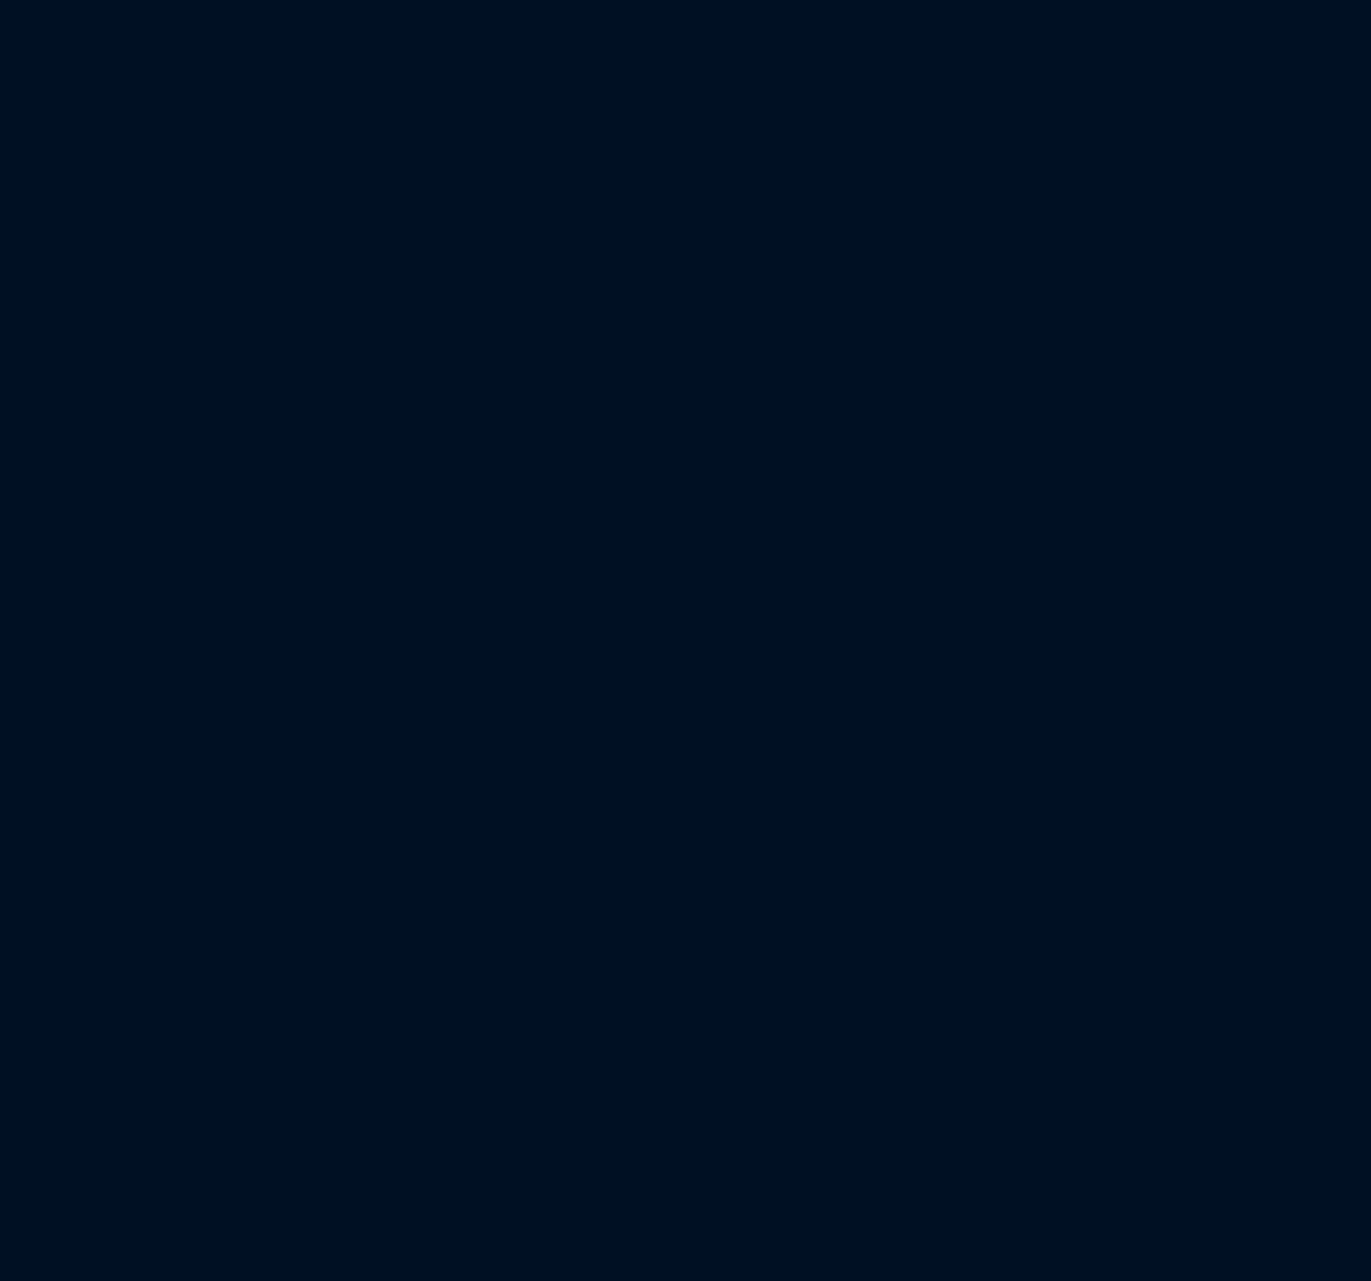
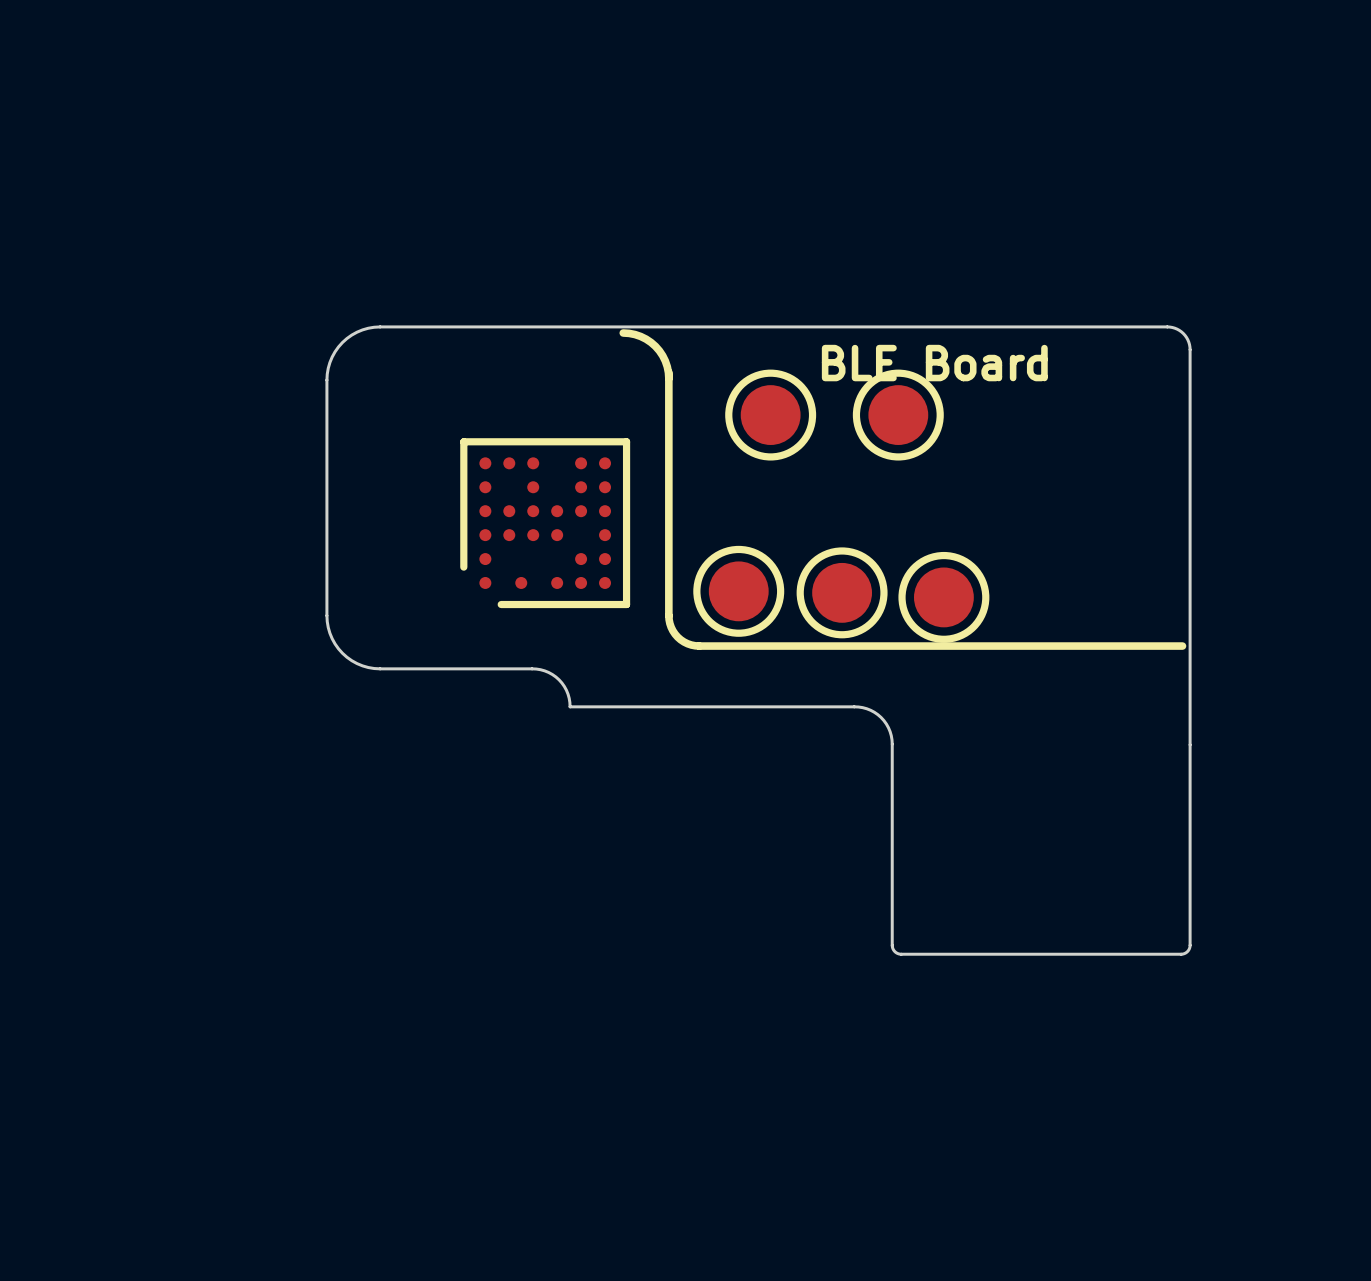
board edge: none -> (380, 326) (1167, 326) (1181, 331) (1187, 339) (1190, 349) (1190, 945) (1188, 950) (1181, 954) (901, 954) (895, 952) (892, 945) (892, 739) (883, 720) (866, 708) (854, 706) (570, 706) (568, 694) (561, 683) (552, 674) (540, 669) (374, 668) (357, 663) (346, 657) (332, 638) (327, 621) (327, 374) (332, 357) (342, 342) (357, 332) (380, 326)
line: none -> (623, 333) (640, 336) (655, 346) (665, 361) (668, 378)
text: none -> BLE Board (934, 363)
line: none -> (668, 372) (668, 615) (672, 630) (684, 641) (699, 646) (1182, 646)
part: none -> (770, 415)
part: none -> (898, 415)
part: none -> (545, 523)
part: none -> (738, 591)
part: none -> (842, 592)
part: none -> (943, 597)

